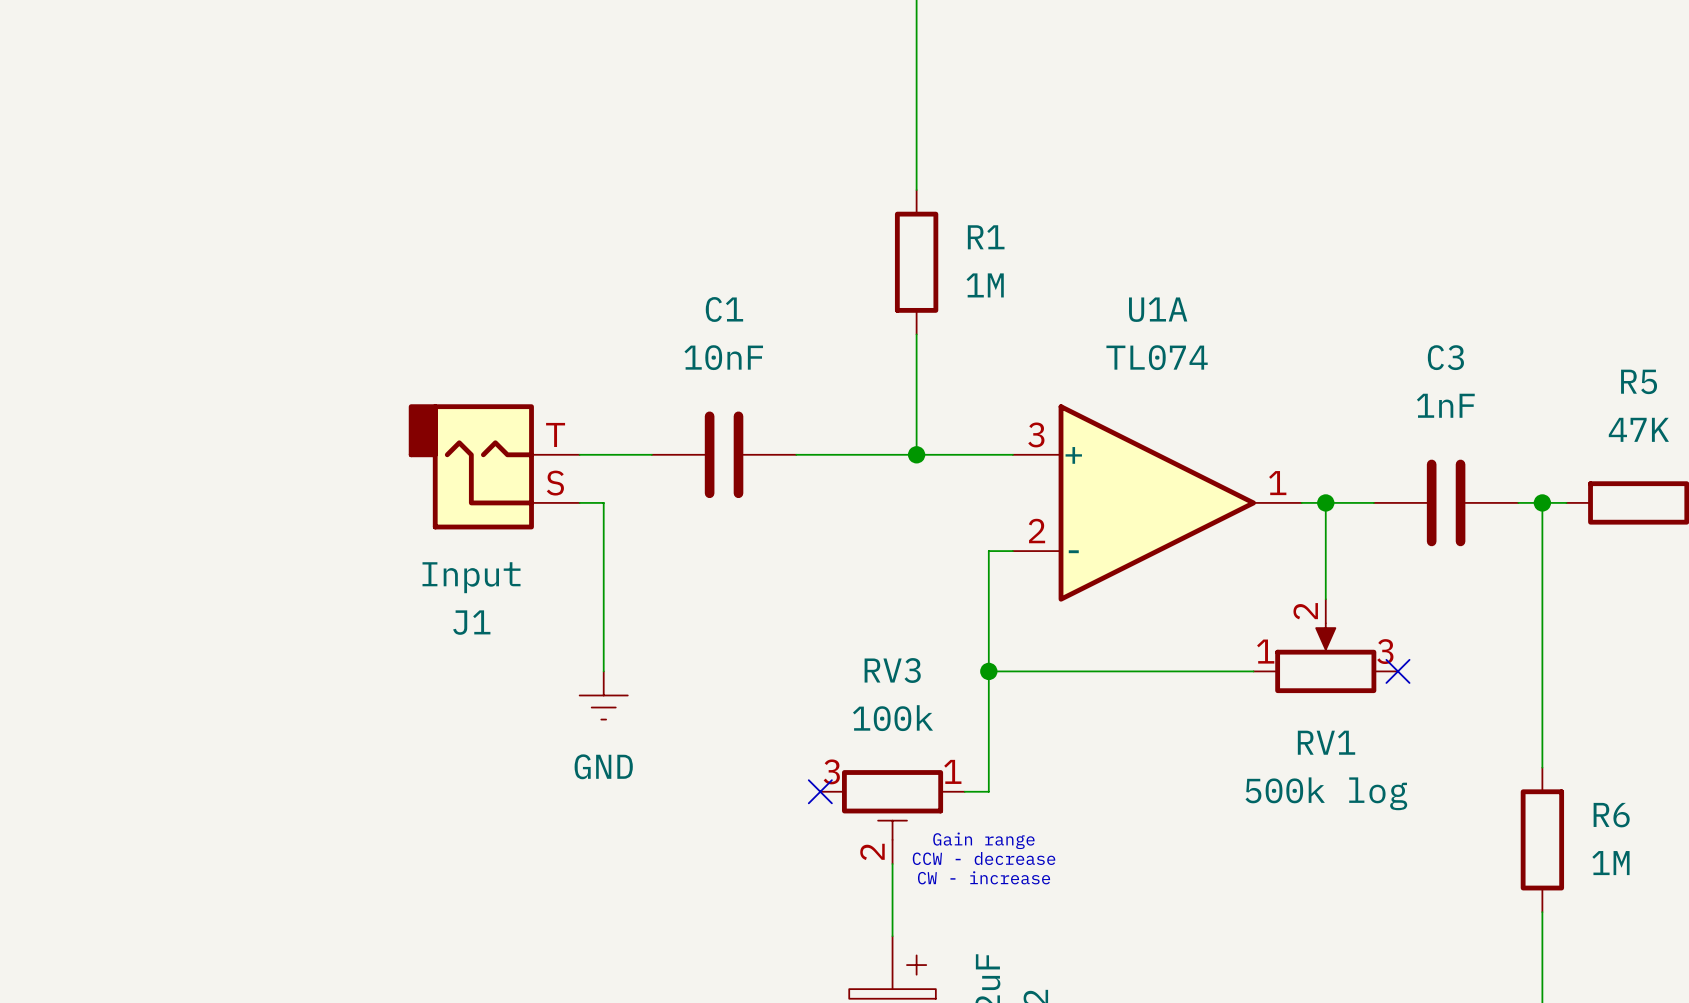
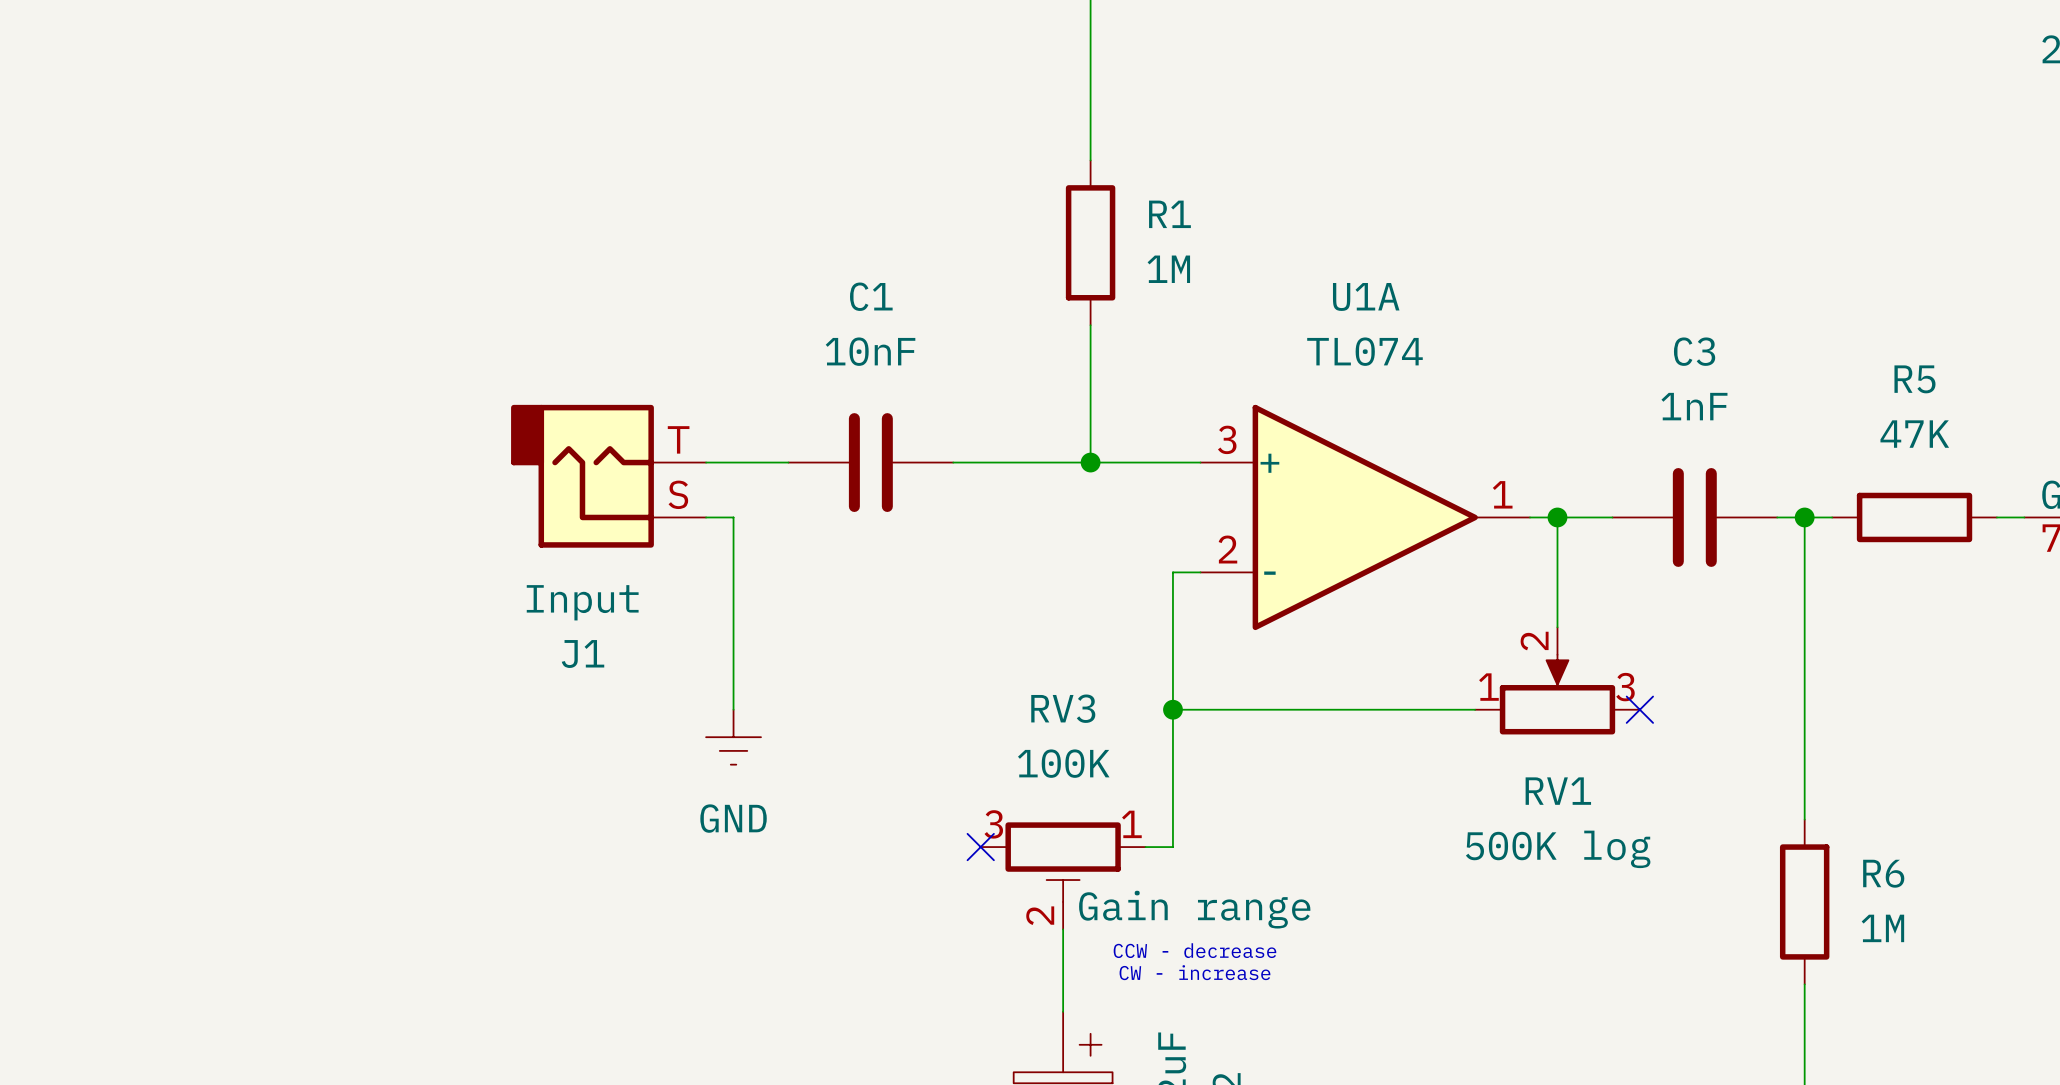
RV3 value: 100k (893, 718) -> 100K (1063, 763)
RV1 value: 500k log (1326, 793) -> 500K log (1558, 849)
text: Gain range (983, 840) -> none
RV3 text: none -> Gain range (1194, 909)
text position: CCW - decrease (984, 858) -> CCW - decrease (1194, 950)
text position: CW - increase (984, 877) -> CW - increase (1194, 972)

